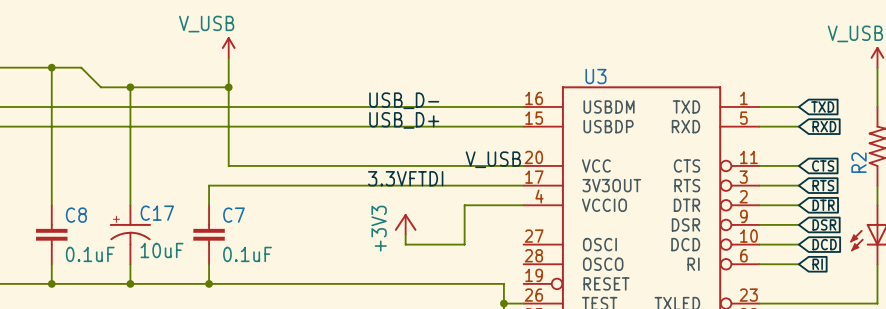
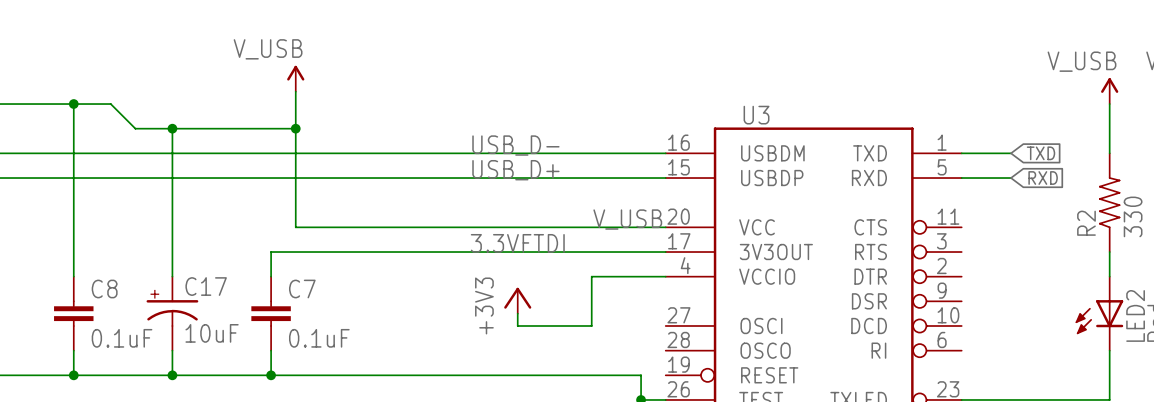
wire: (759, 165) (798, 165) -> none
global label: CTS (823, 165) -> none
wire: (759, 185) (798, 185) -> none
global label: RTS (823, 185) -> none
wire: (759, 205) (798, 205) -> none
global label: DTR (823, 205) -> none
wire: (759, 224) (798, 224) -> none
global label: DSR (824, 224) -> none
wire: (759, 244) (798, 244) -> none
global label: DCD (824, 244) -> none
wire: (759, 264) (798, 264) -> none
global label: RI (817, 264) -> none

